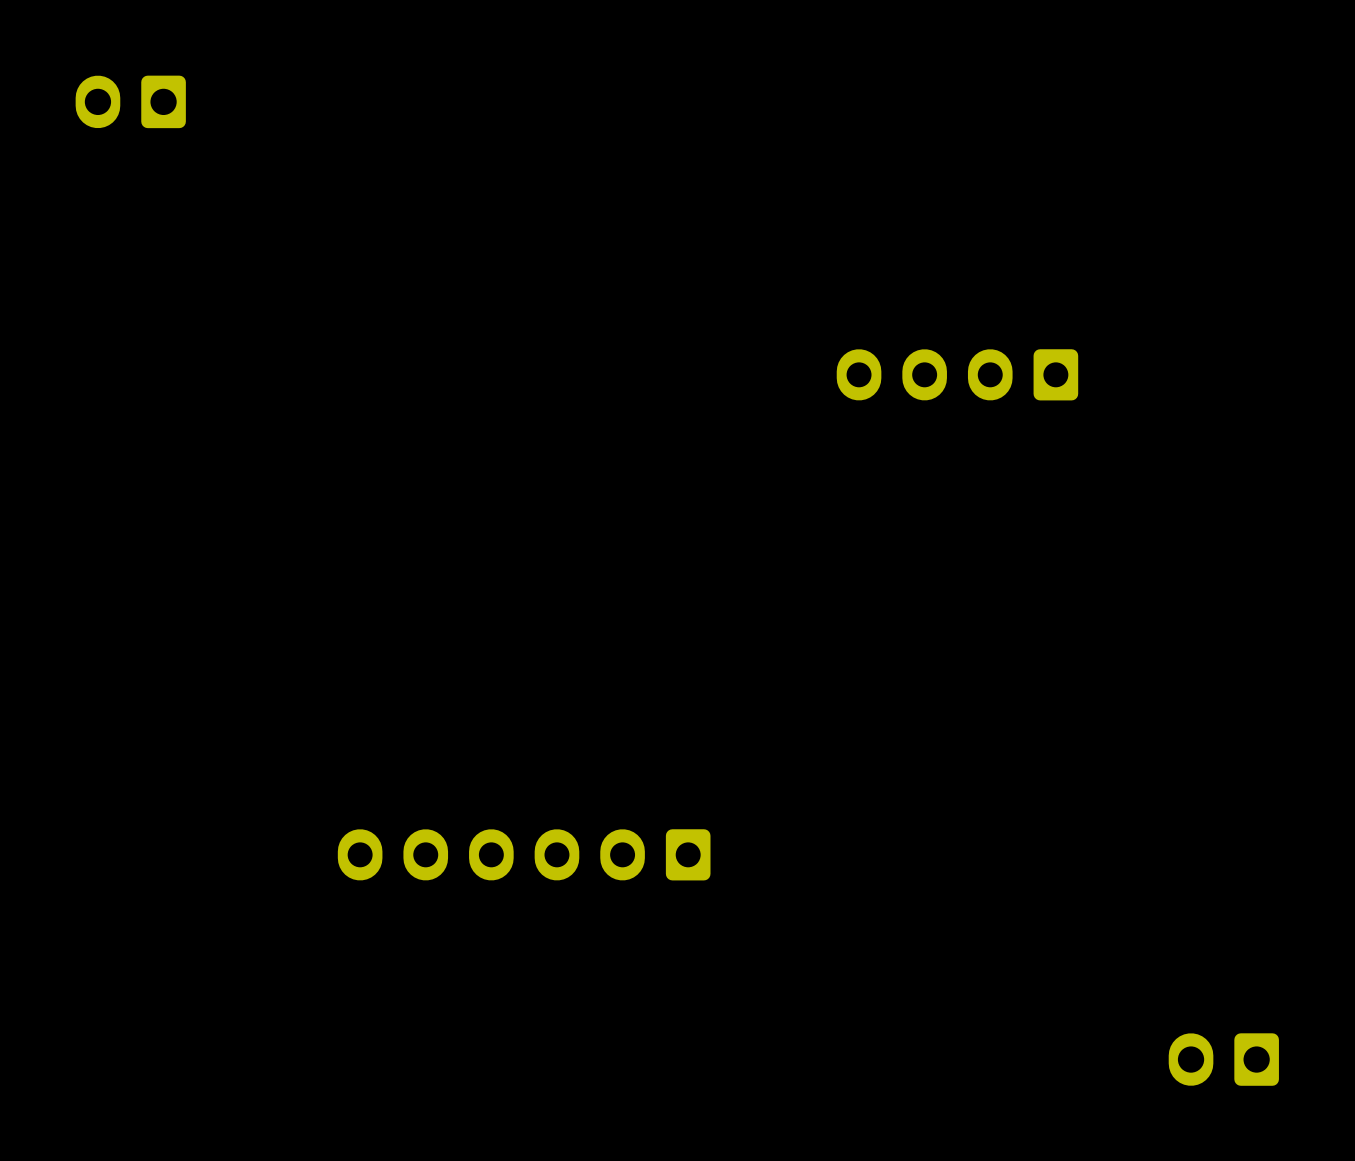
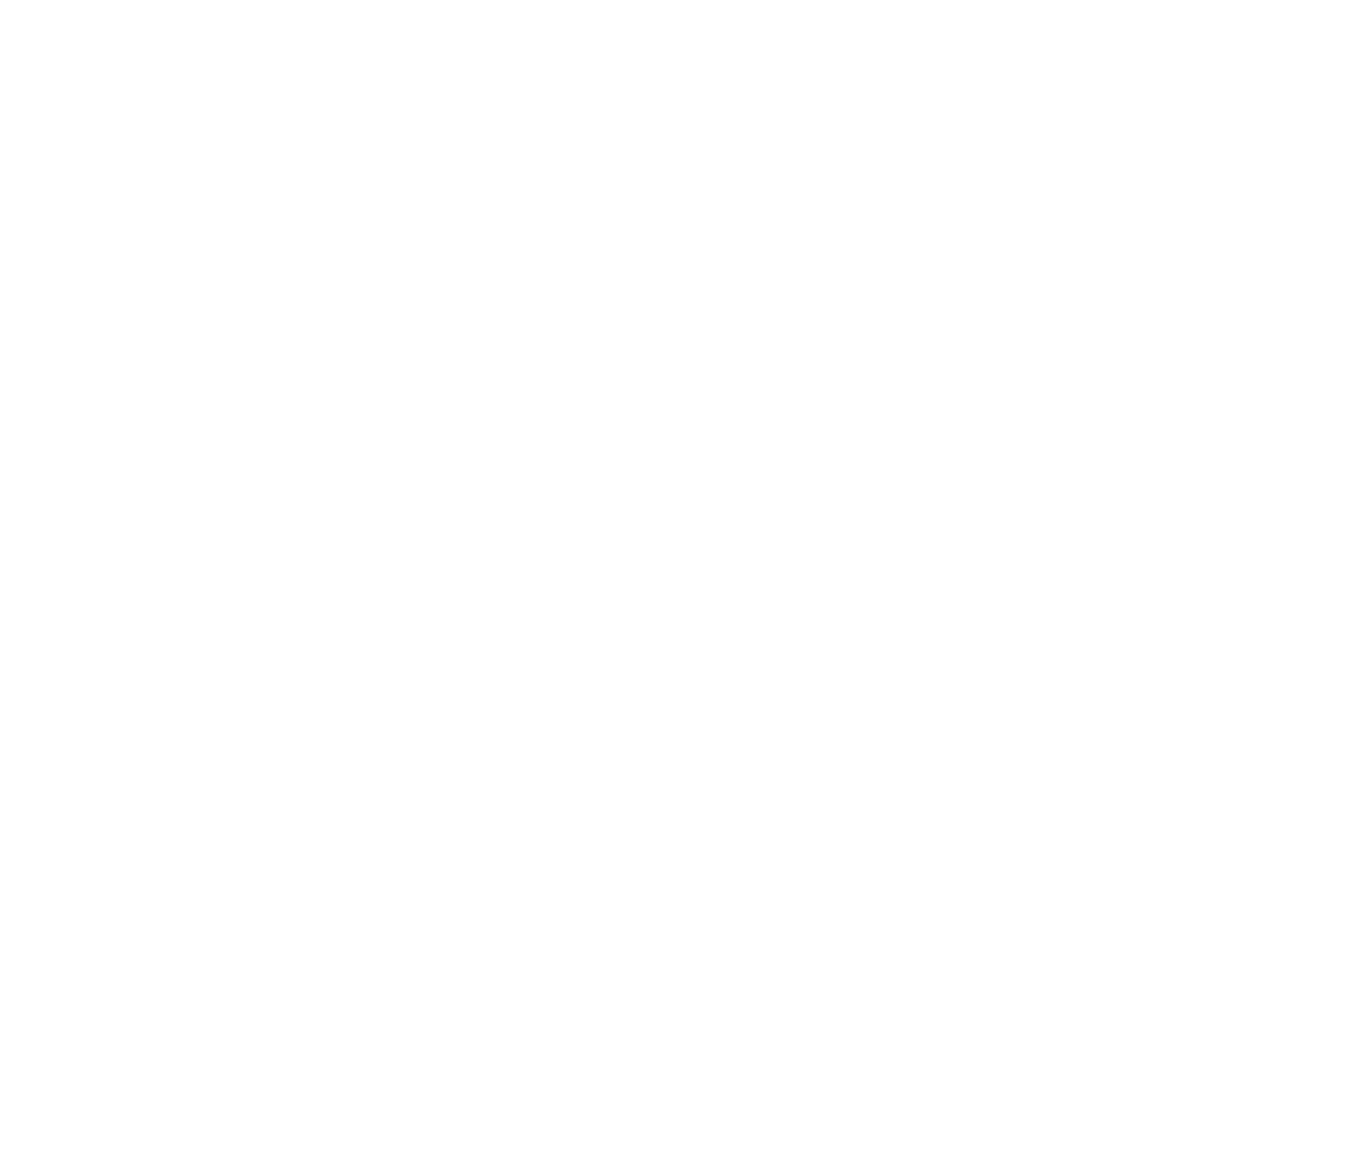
part: (130, 101) -> none
part: (957, 374) -> none
part: (524, 854) -> none
part: (1223, 1059) -> none

